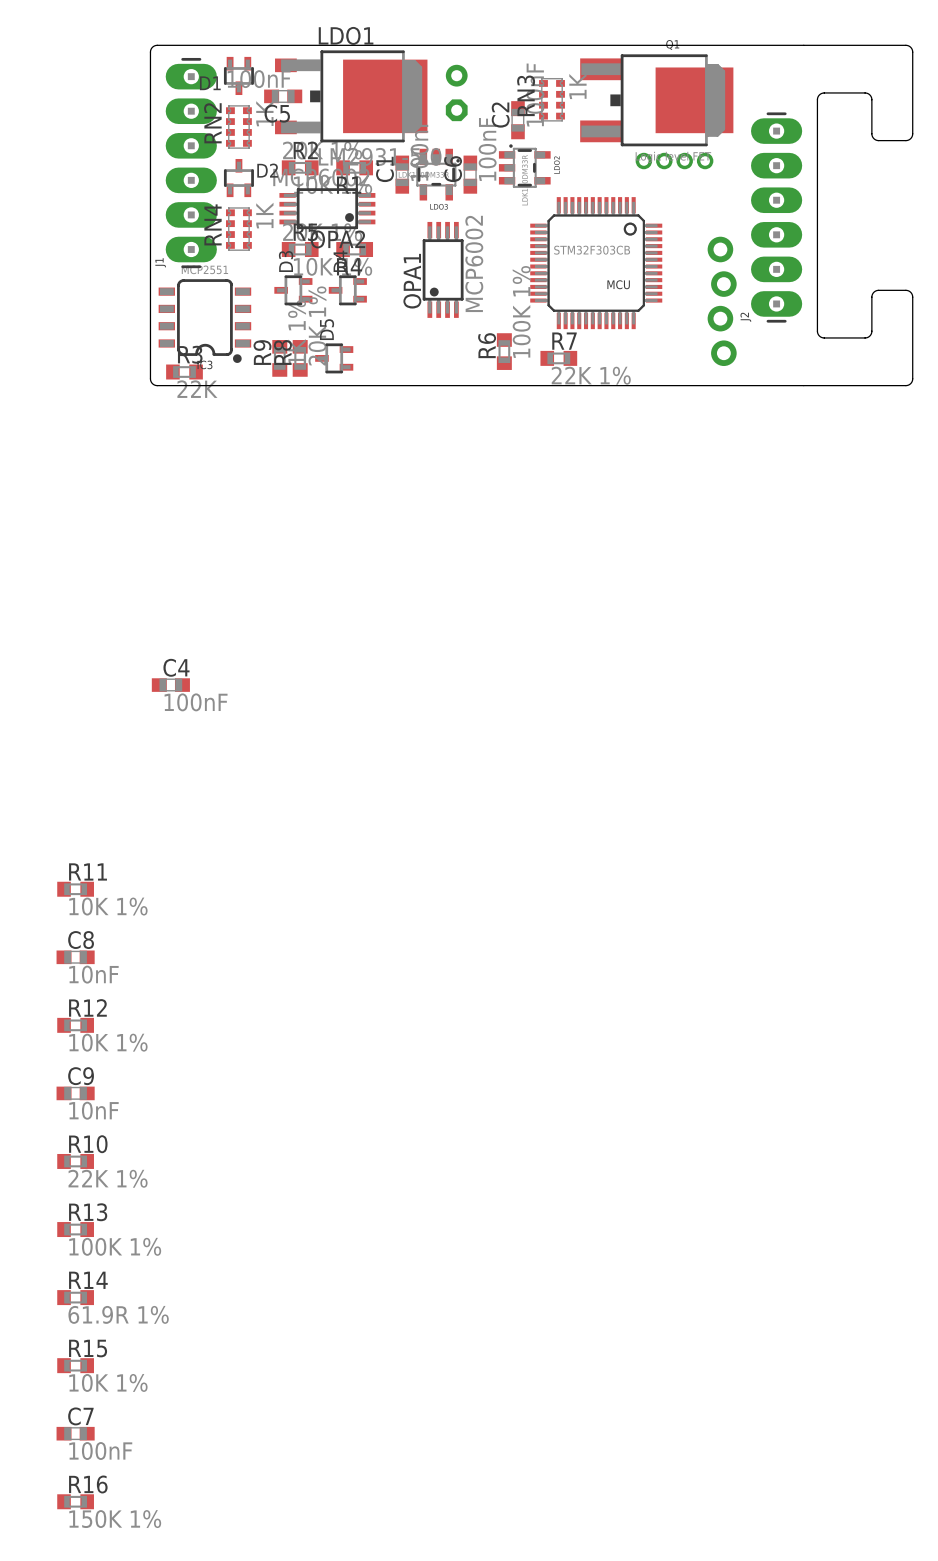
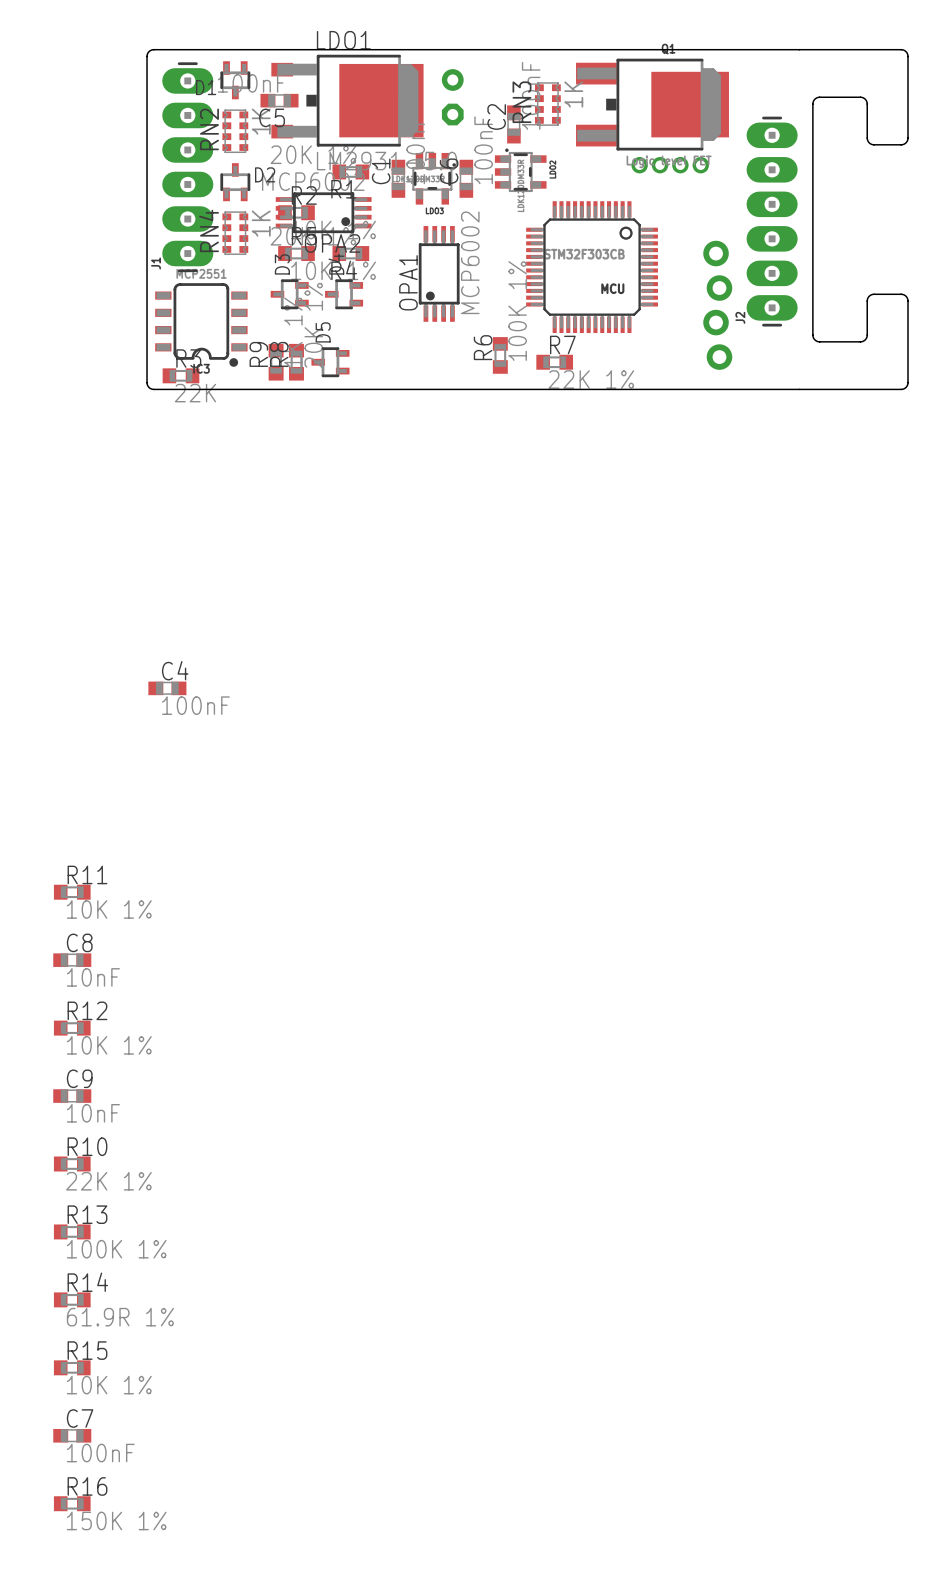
R2 position: (300, 167) -> (296, 212)

